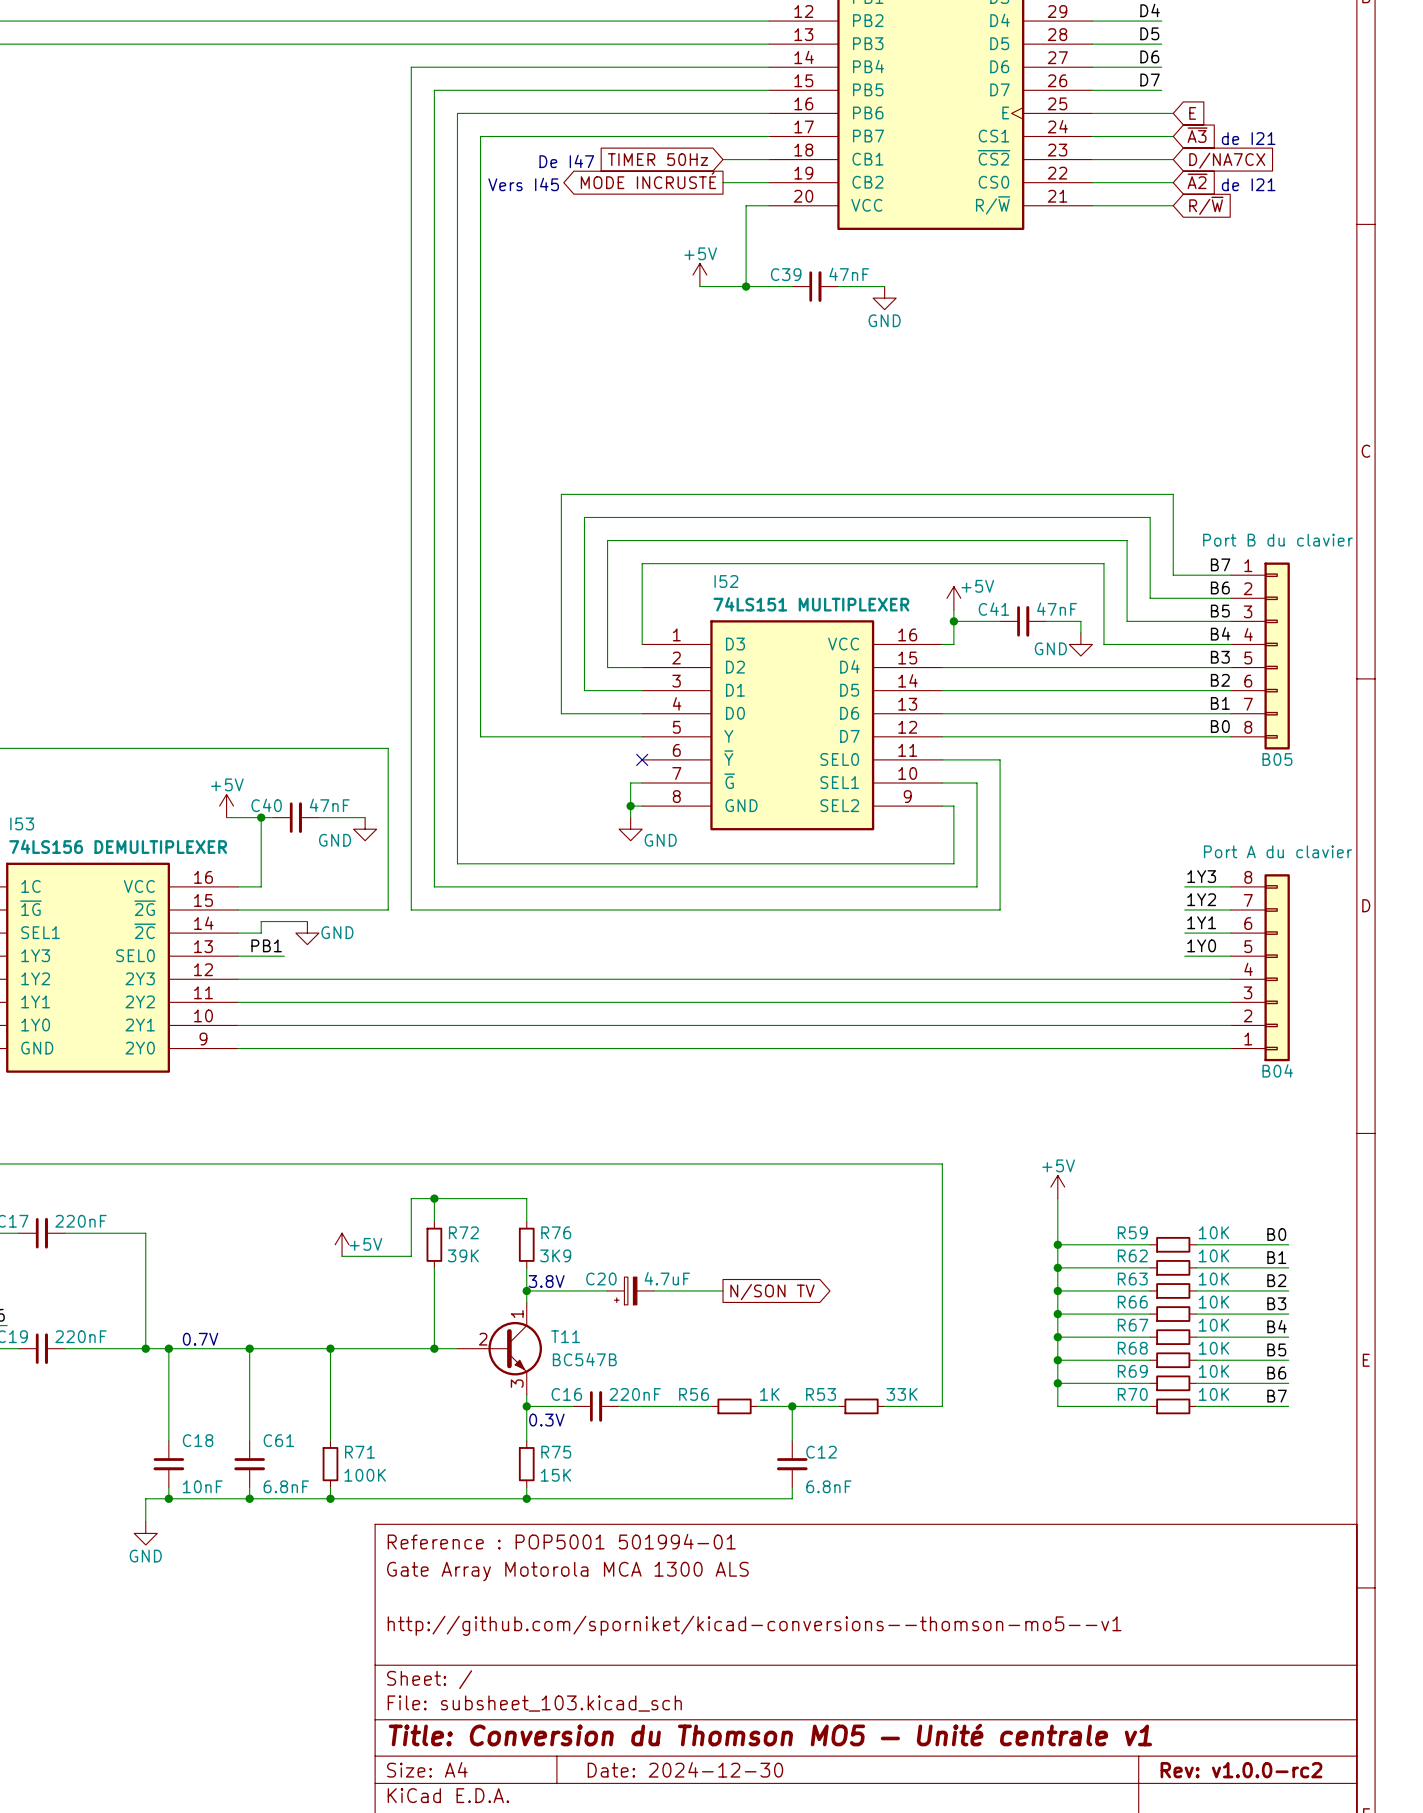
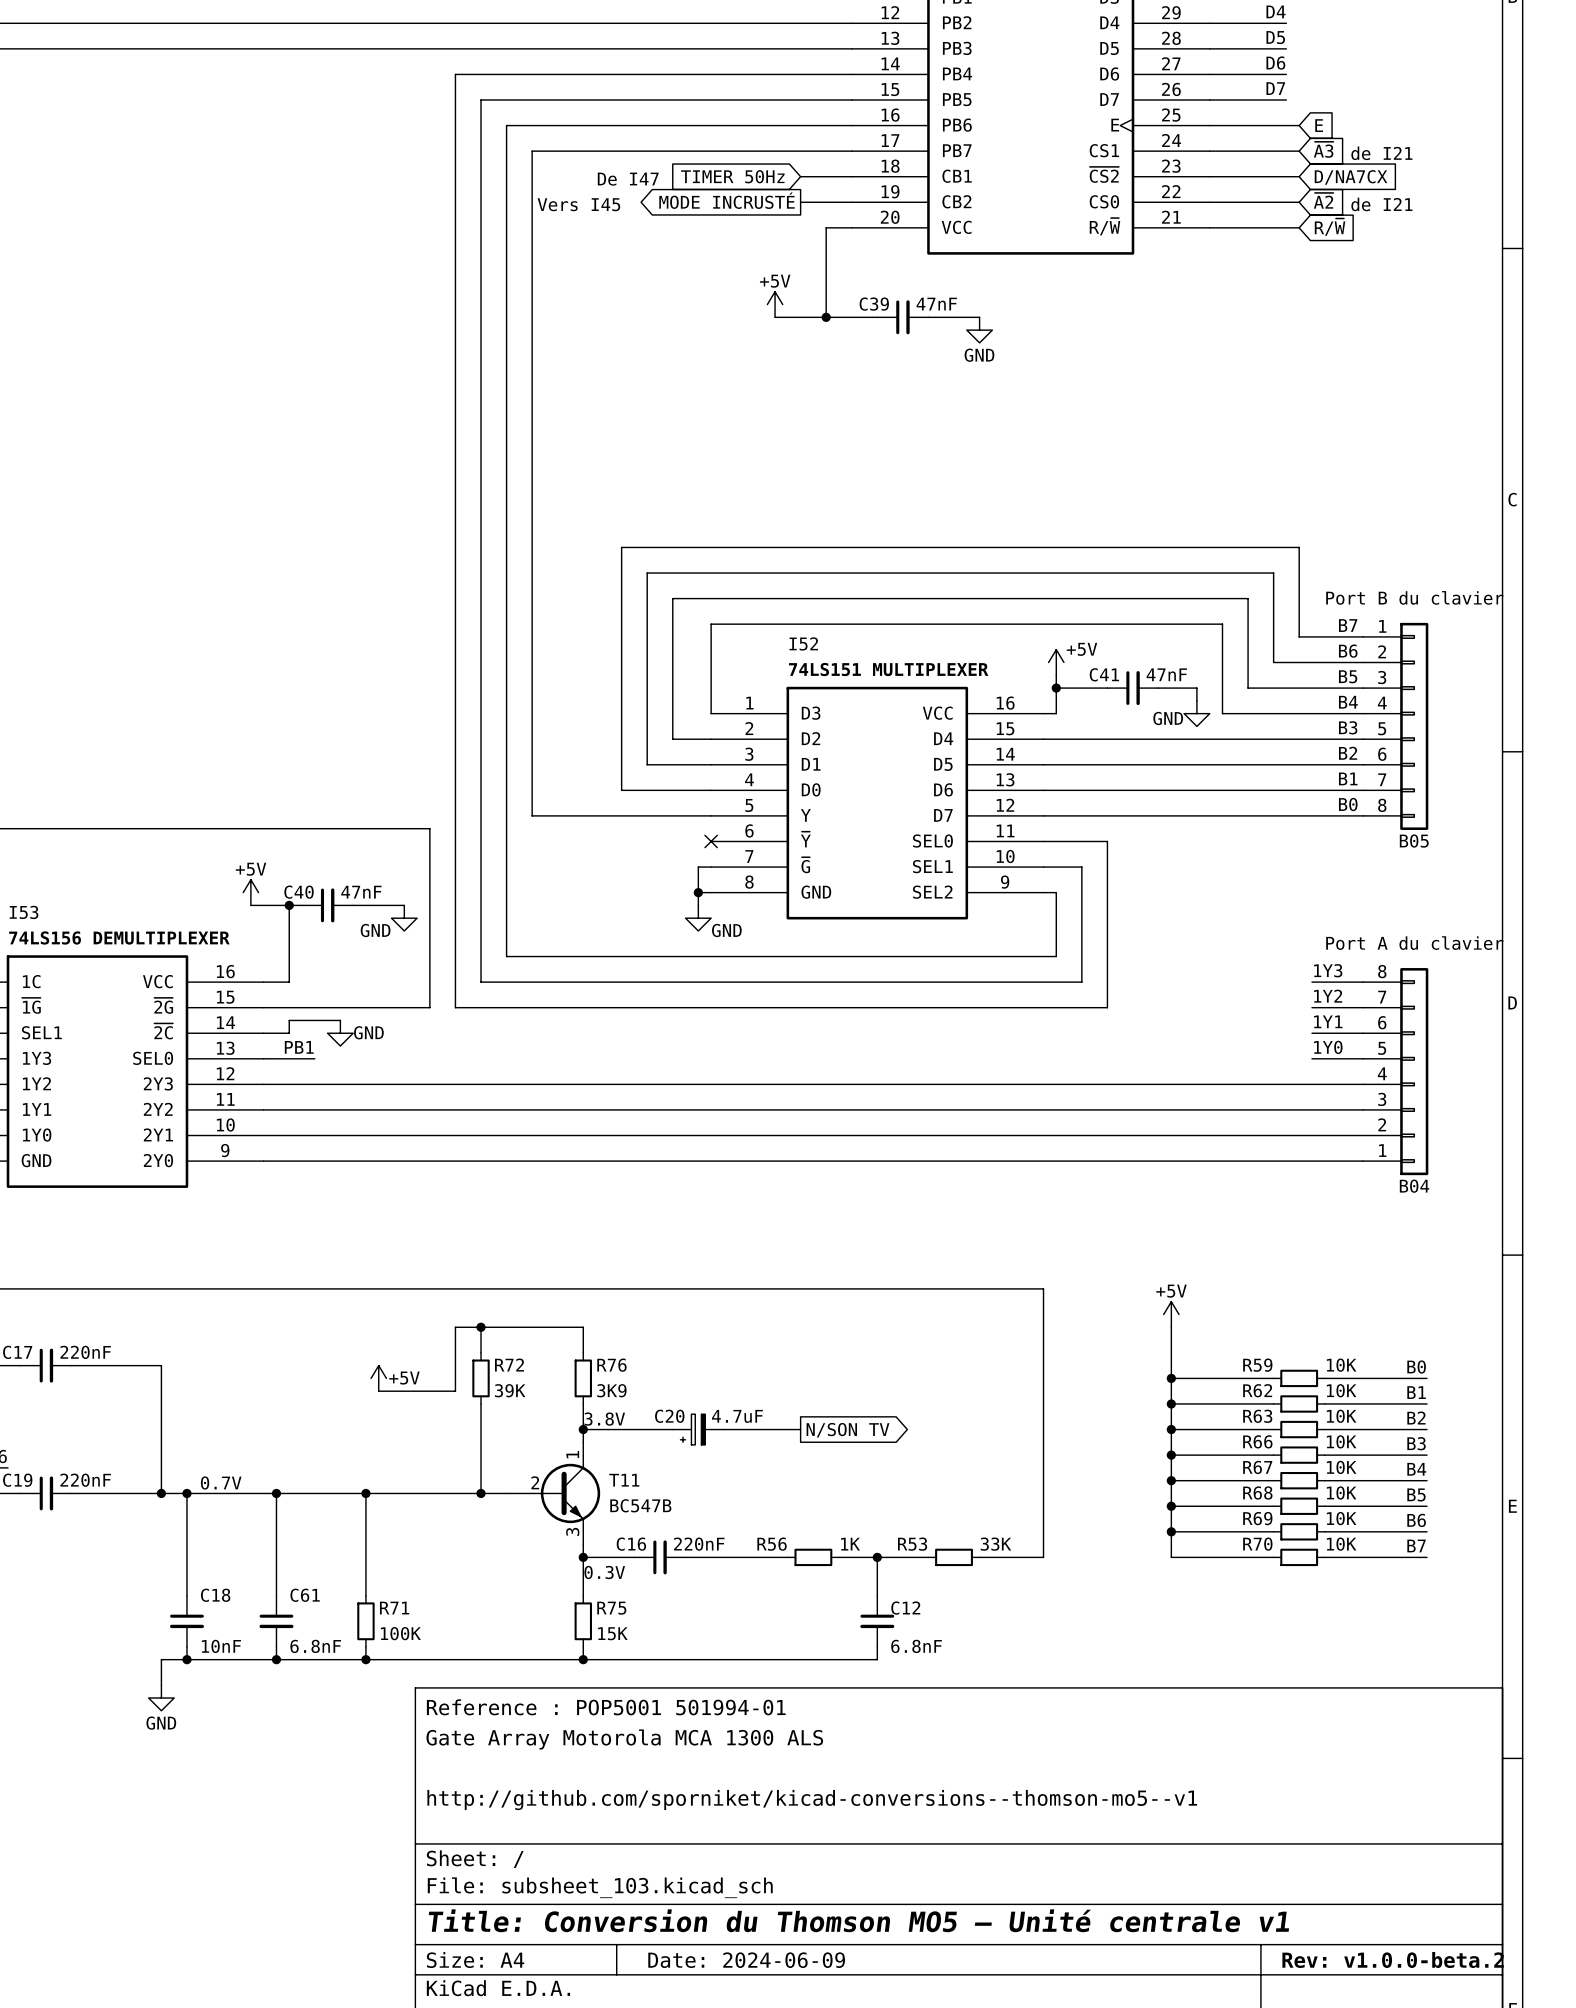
title block: Date: 2024-12-30 (685, 1769) -> Date: 2024-06-09 (746, 1960)
title block: Rev: v1.0.0-rc2 (1241, 1770) -> Rev: v1.0.0-beta.2 (1393, 1960)

